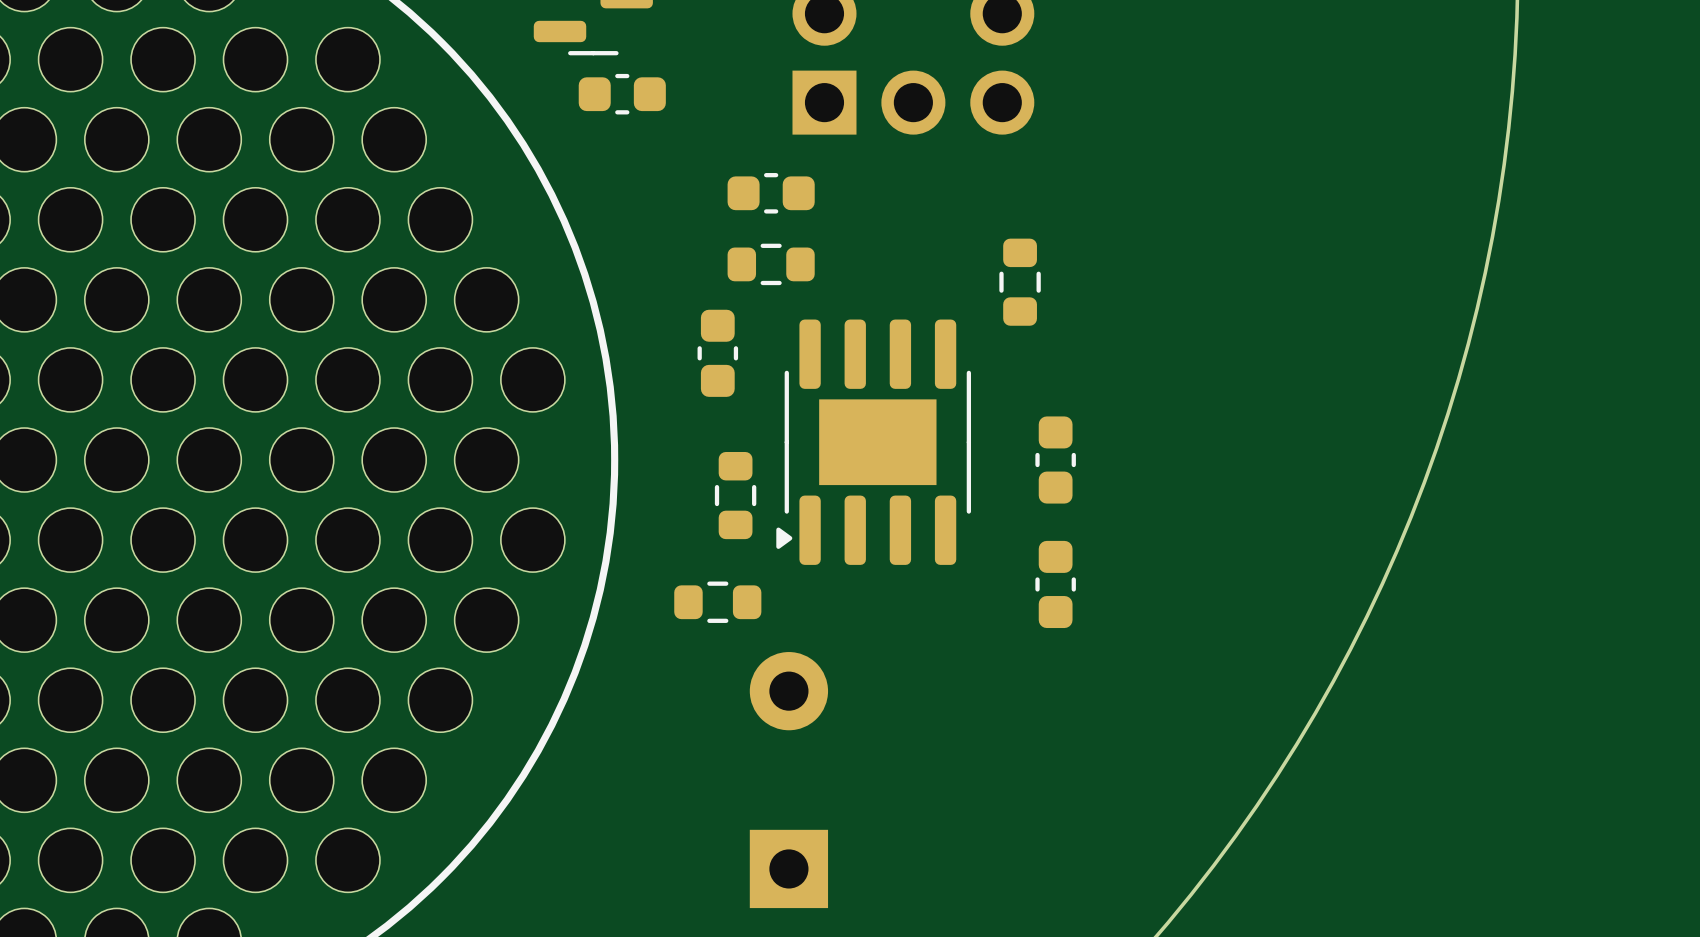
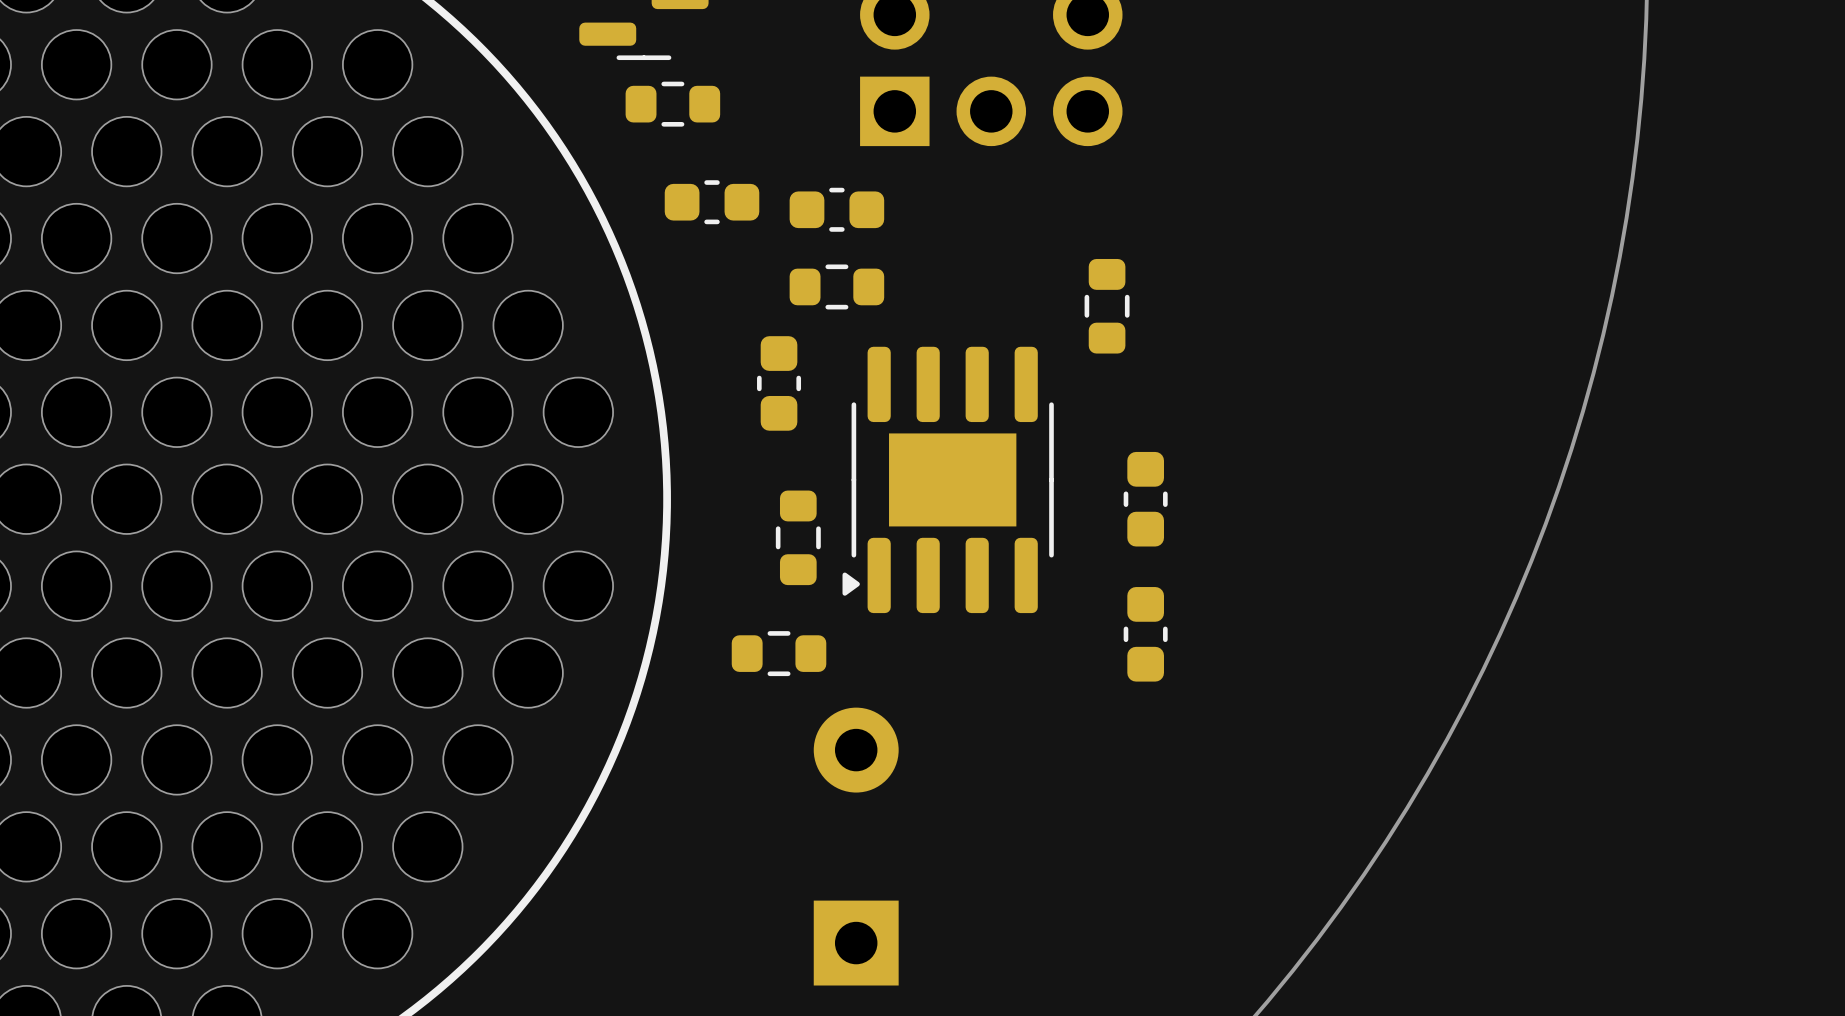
part footprint: [578, 73, 666, 115] -> [625, 81, 721, 127]
part: none -> (712, 202)

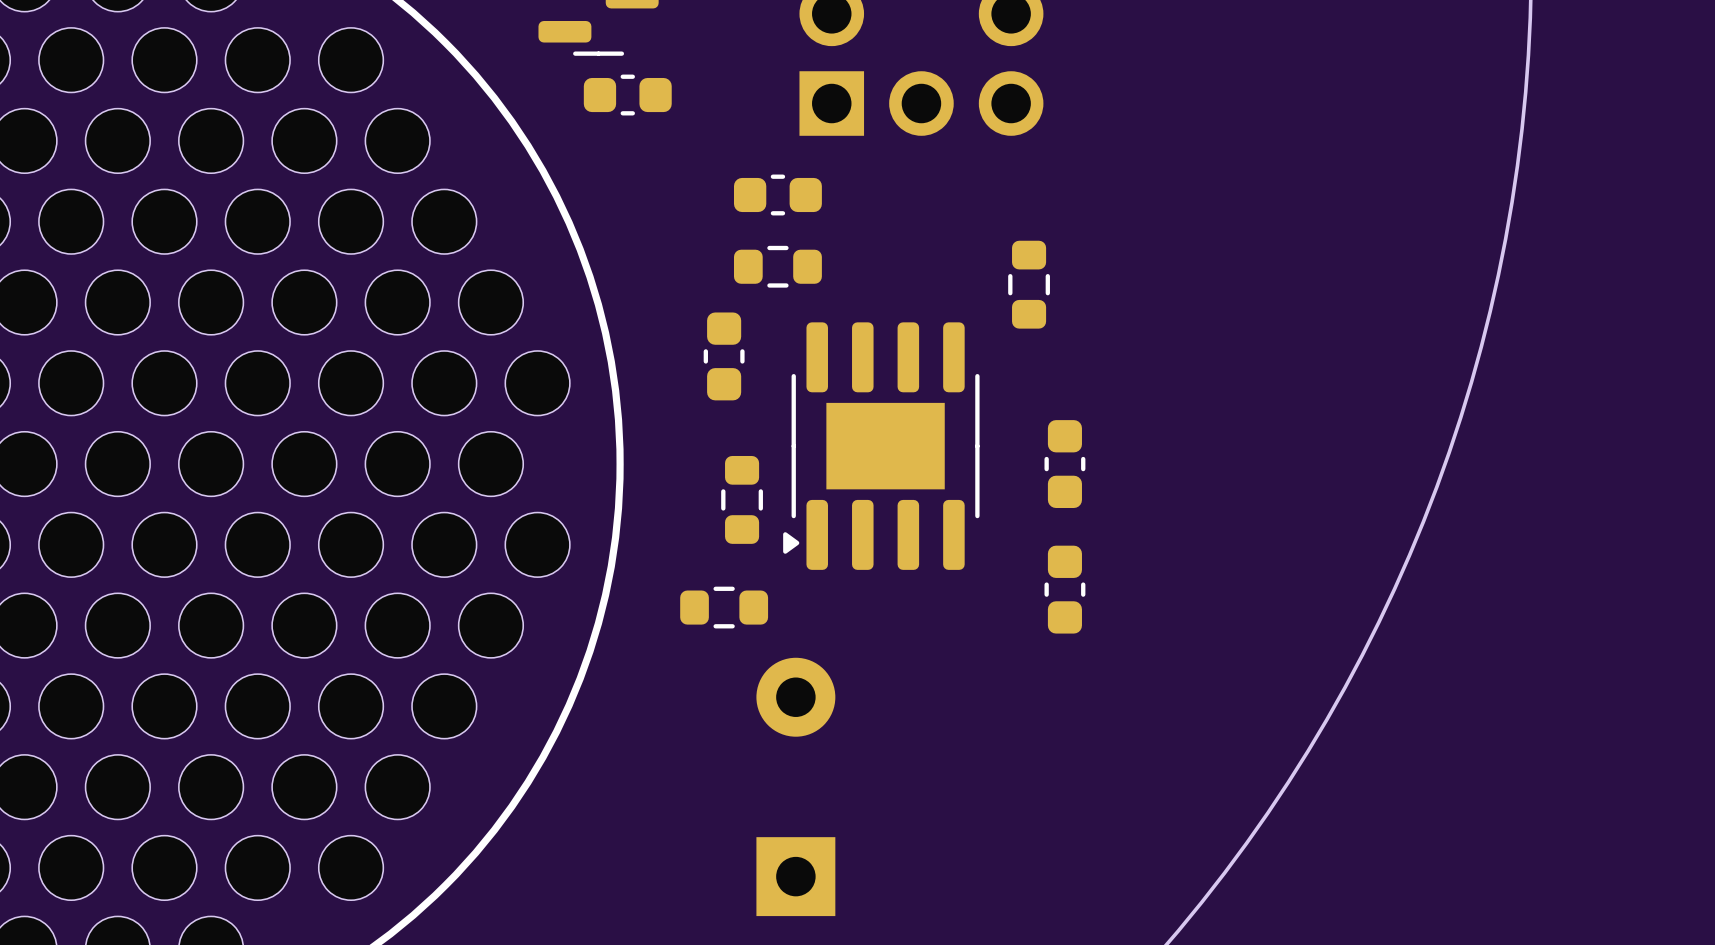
part footprint: [625, 81, 721, 127] -> [583, 74, 672, 116]
part: (712, 202) -> none

